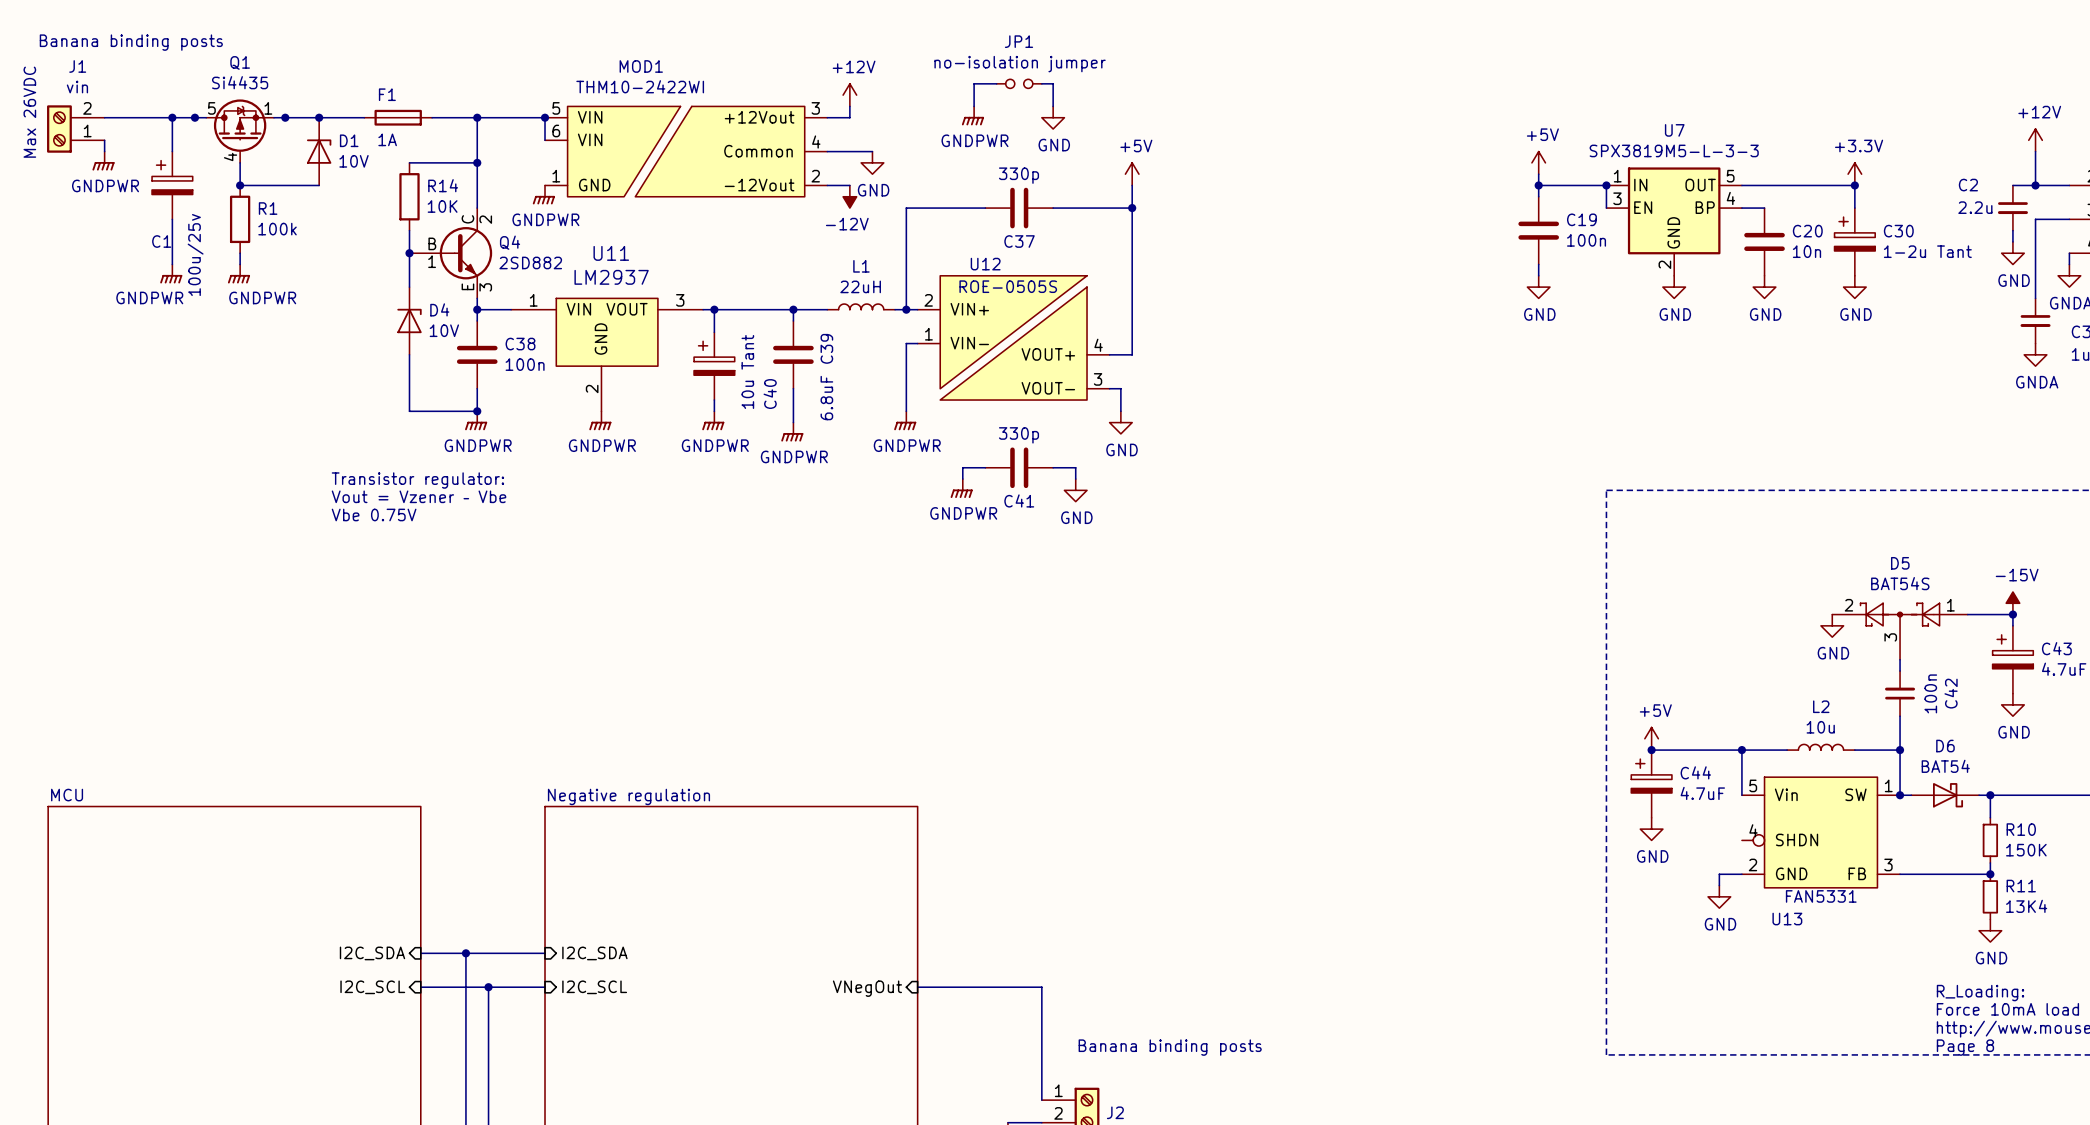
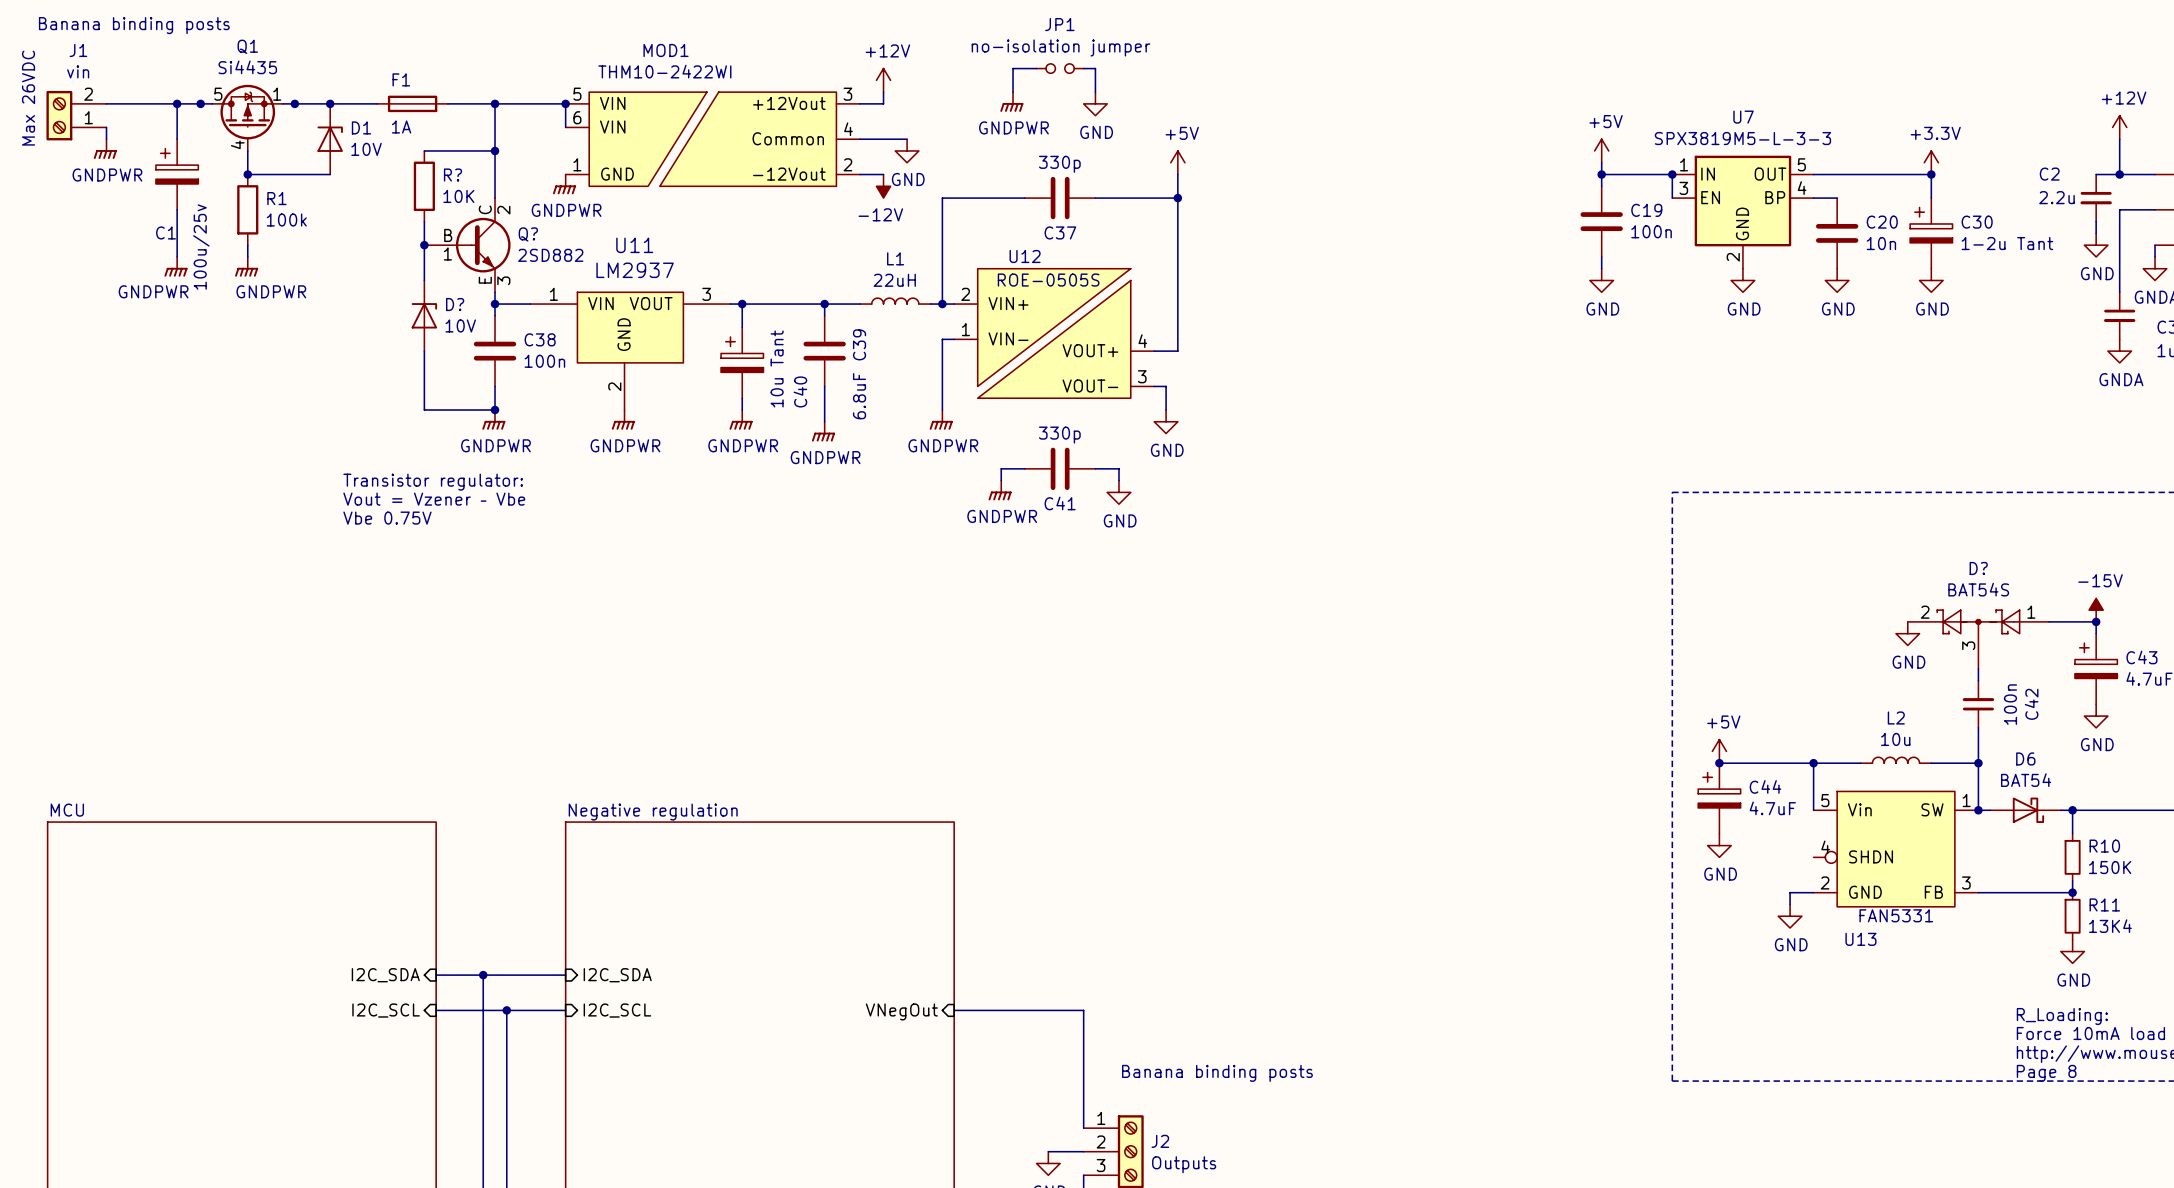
R14 name: R14 (443, 185) -> R? (452, 175)
Q4 name: Q4 (510, 242) -> Q? (528, 234)
D4 name: D4 (439, 309) -> D? (455, 304)
D5 name: D5 (1900, 563) -> D? (1978, 568)

